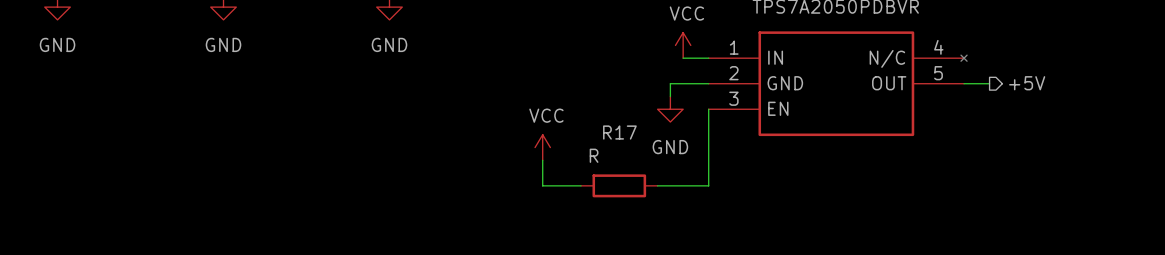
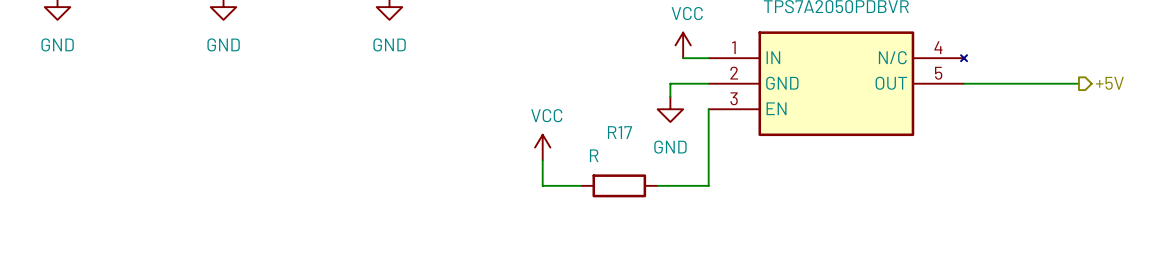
wire: none -> (989, 83) (1078, 83)
hierarchical label position: +5V (1027, 83) -> +5V (1109, 83)

